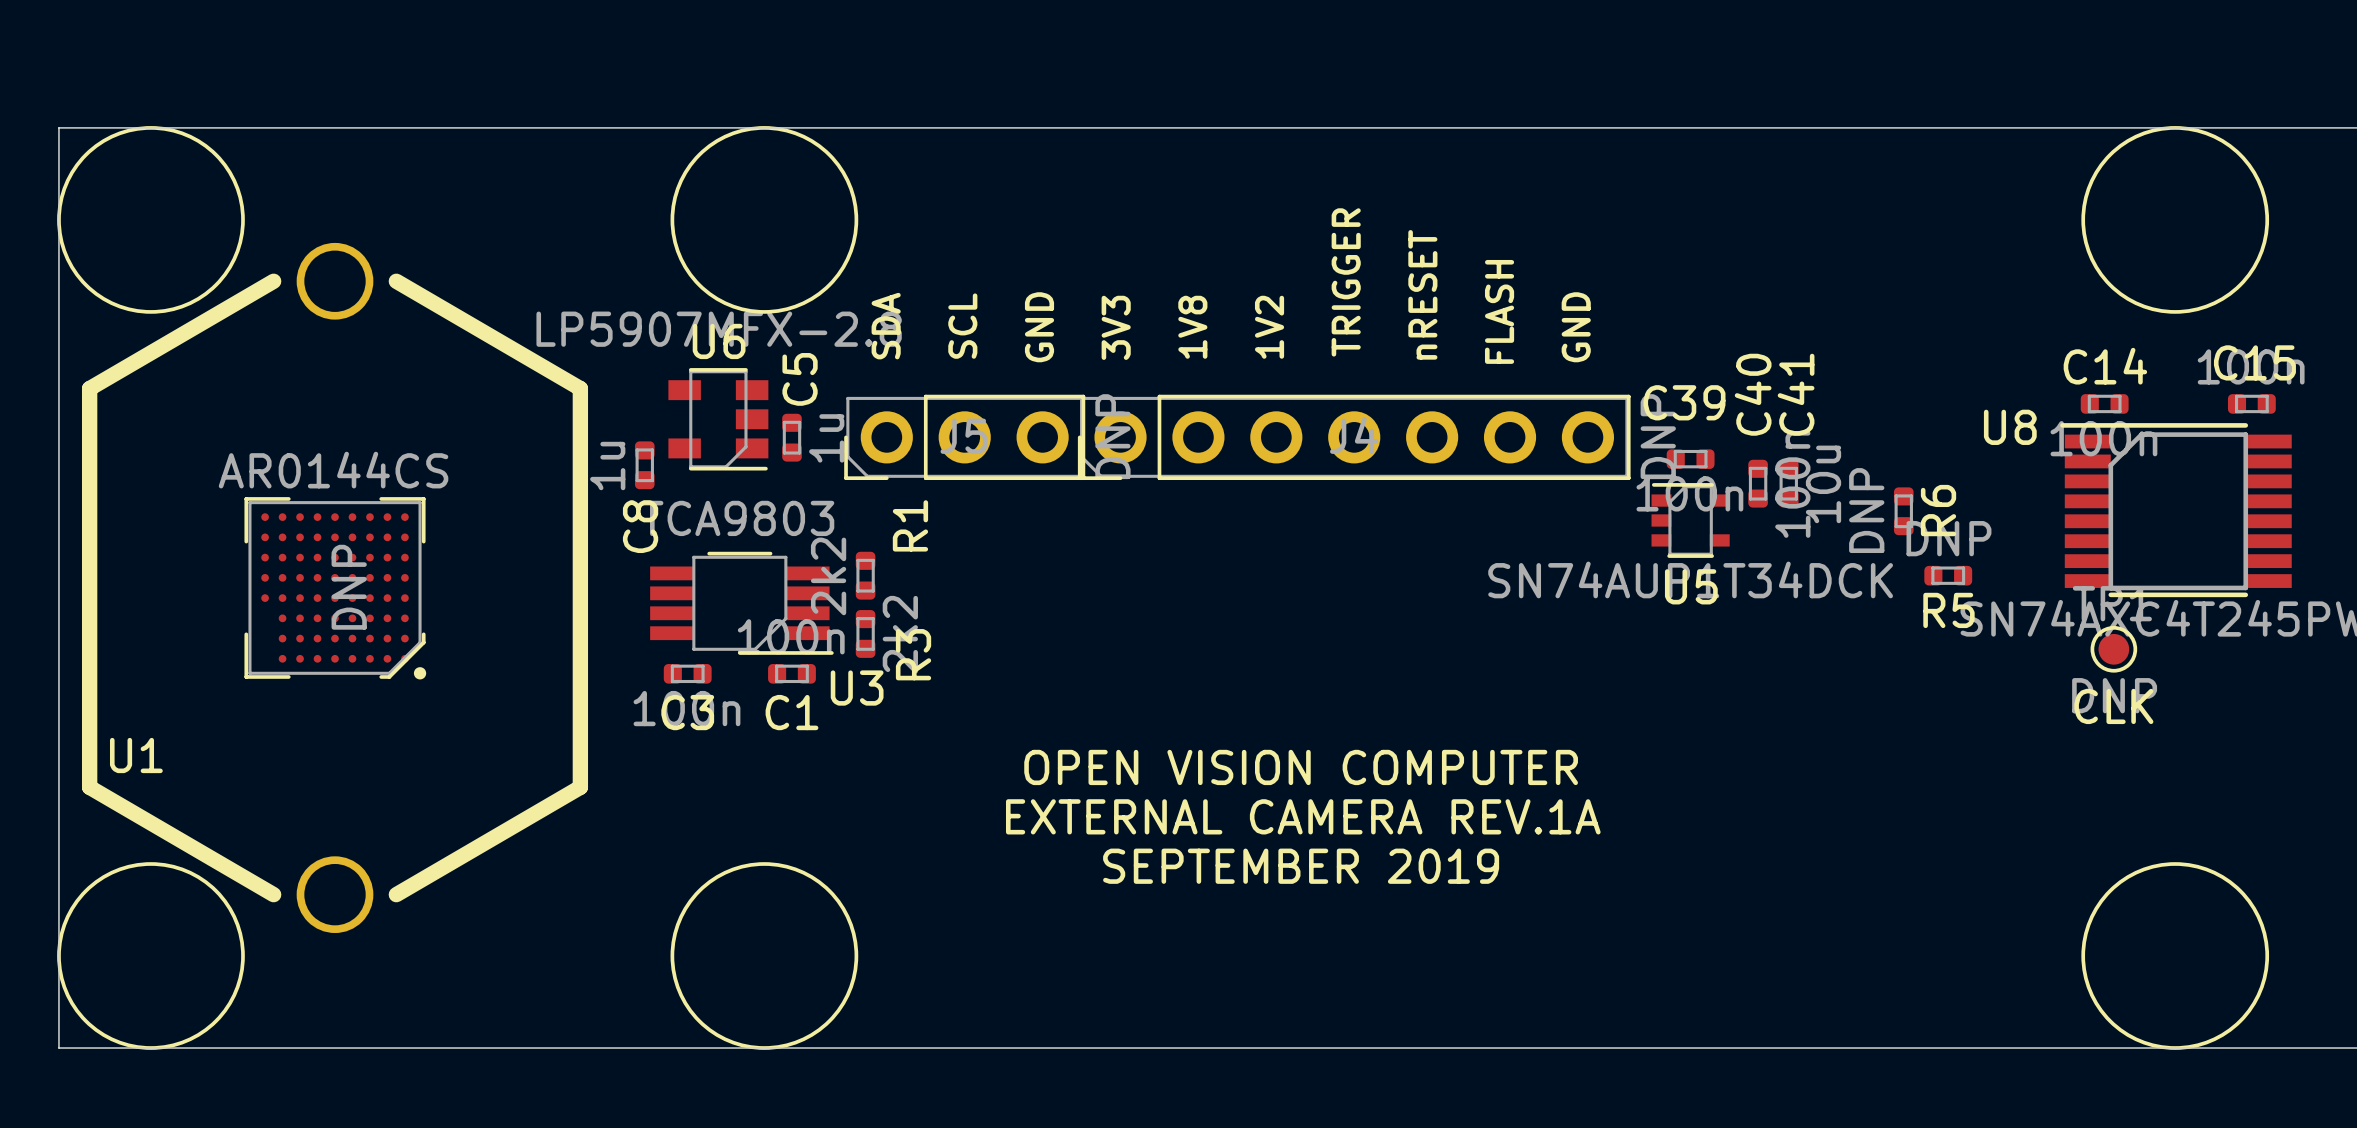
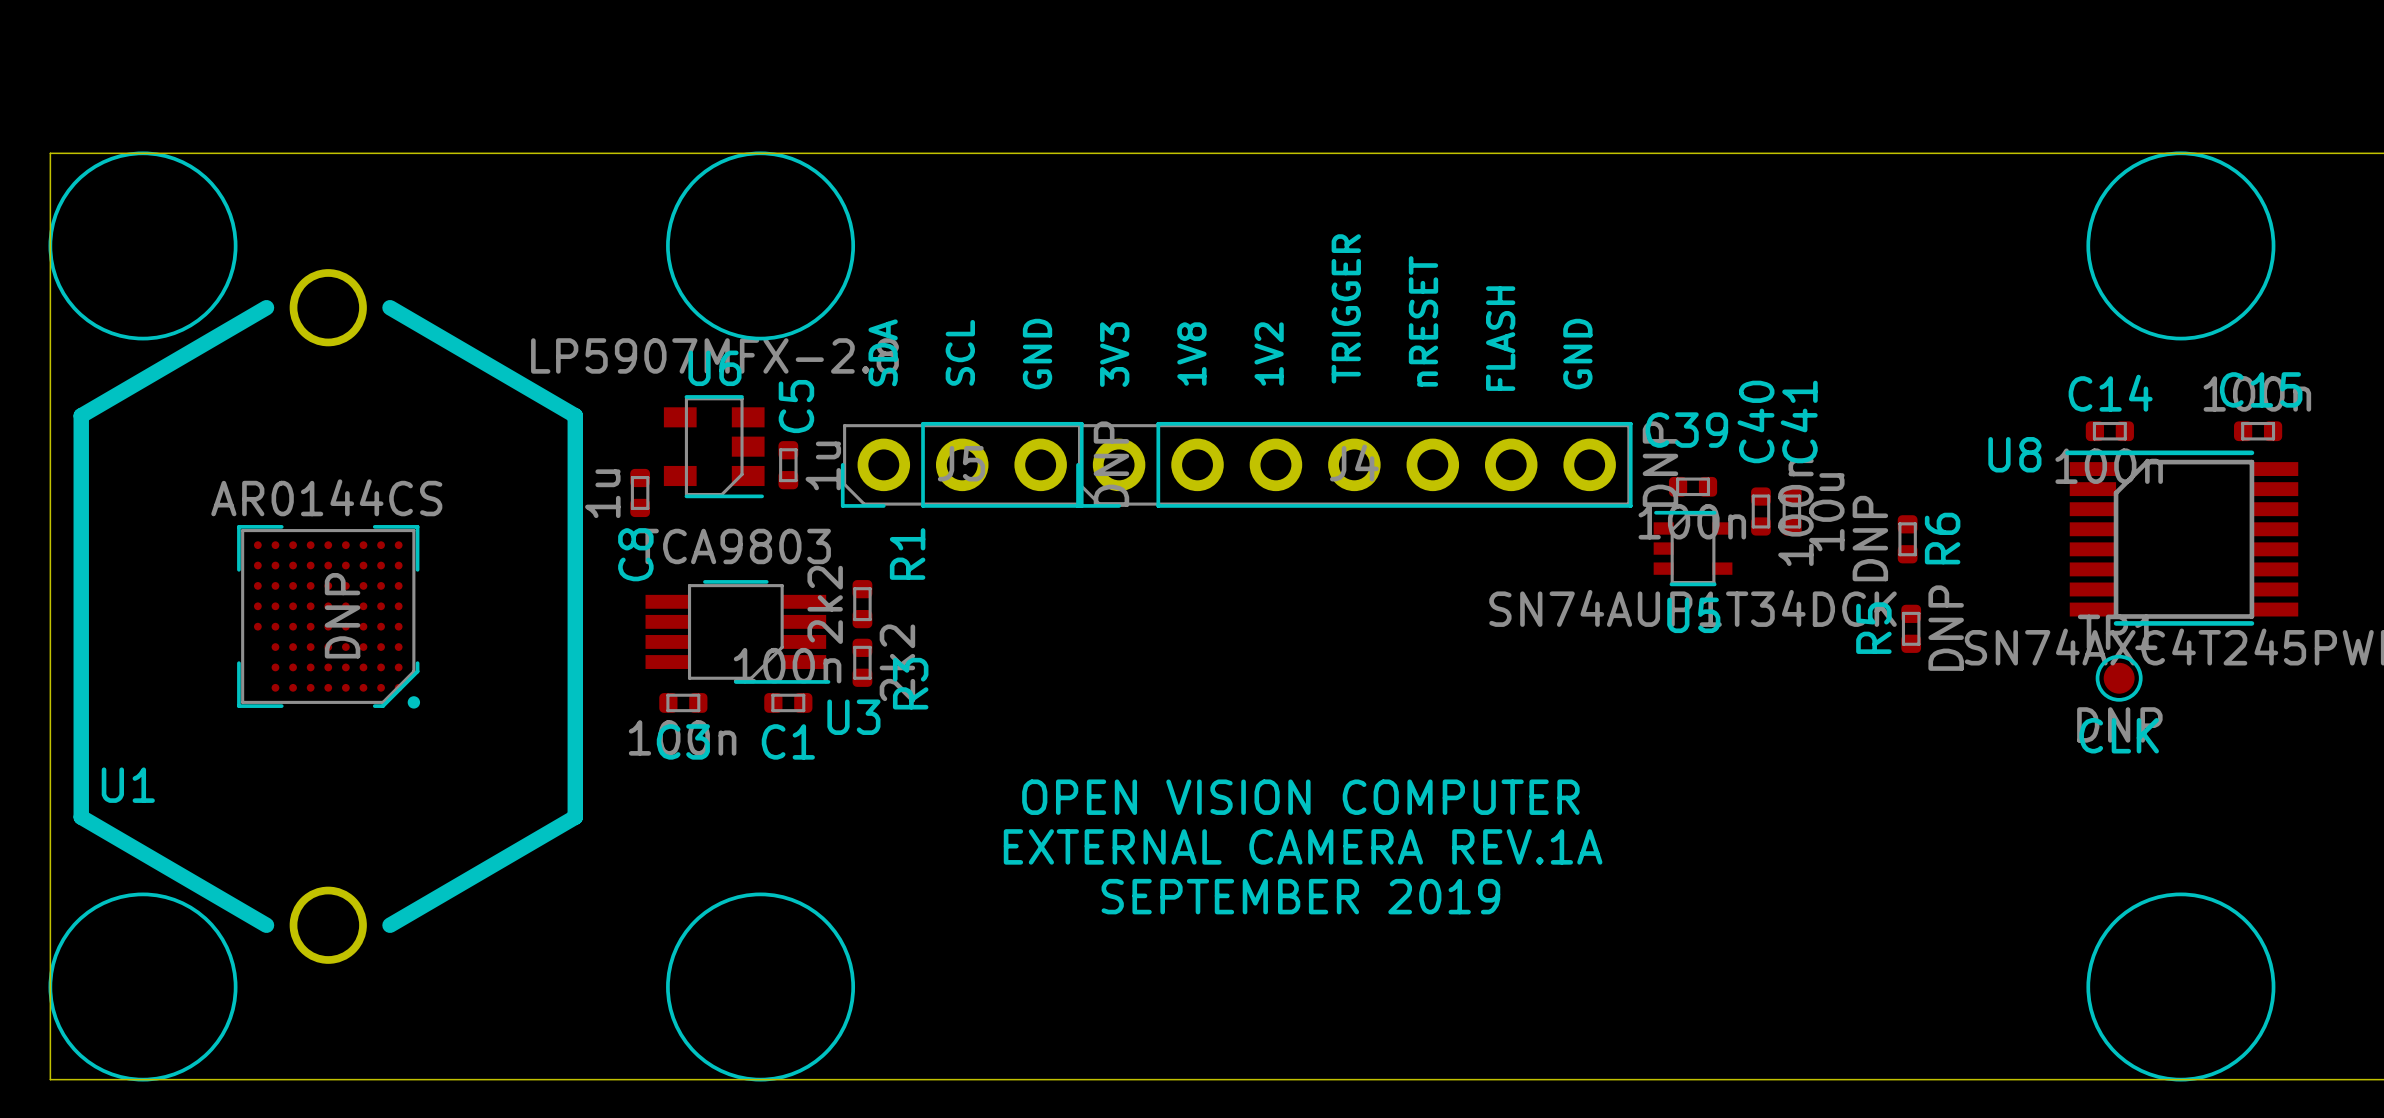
R5 rotation: 0° (1948, 575) -> 90° clockwise (1911, 628)
R5 position: (1948, 575) -> (1911, 628)

